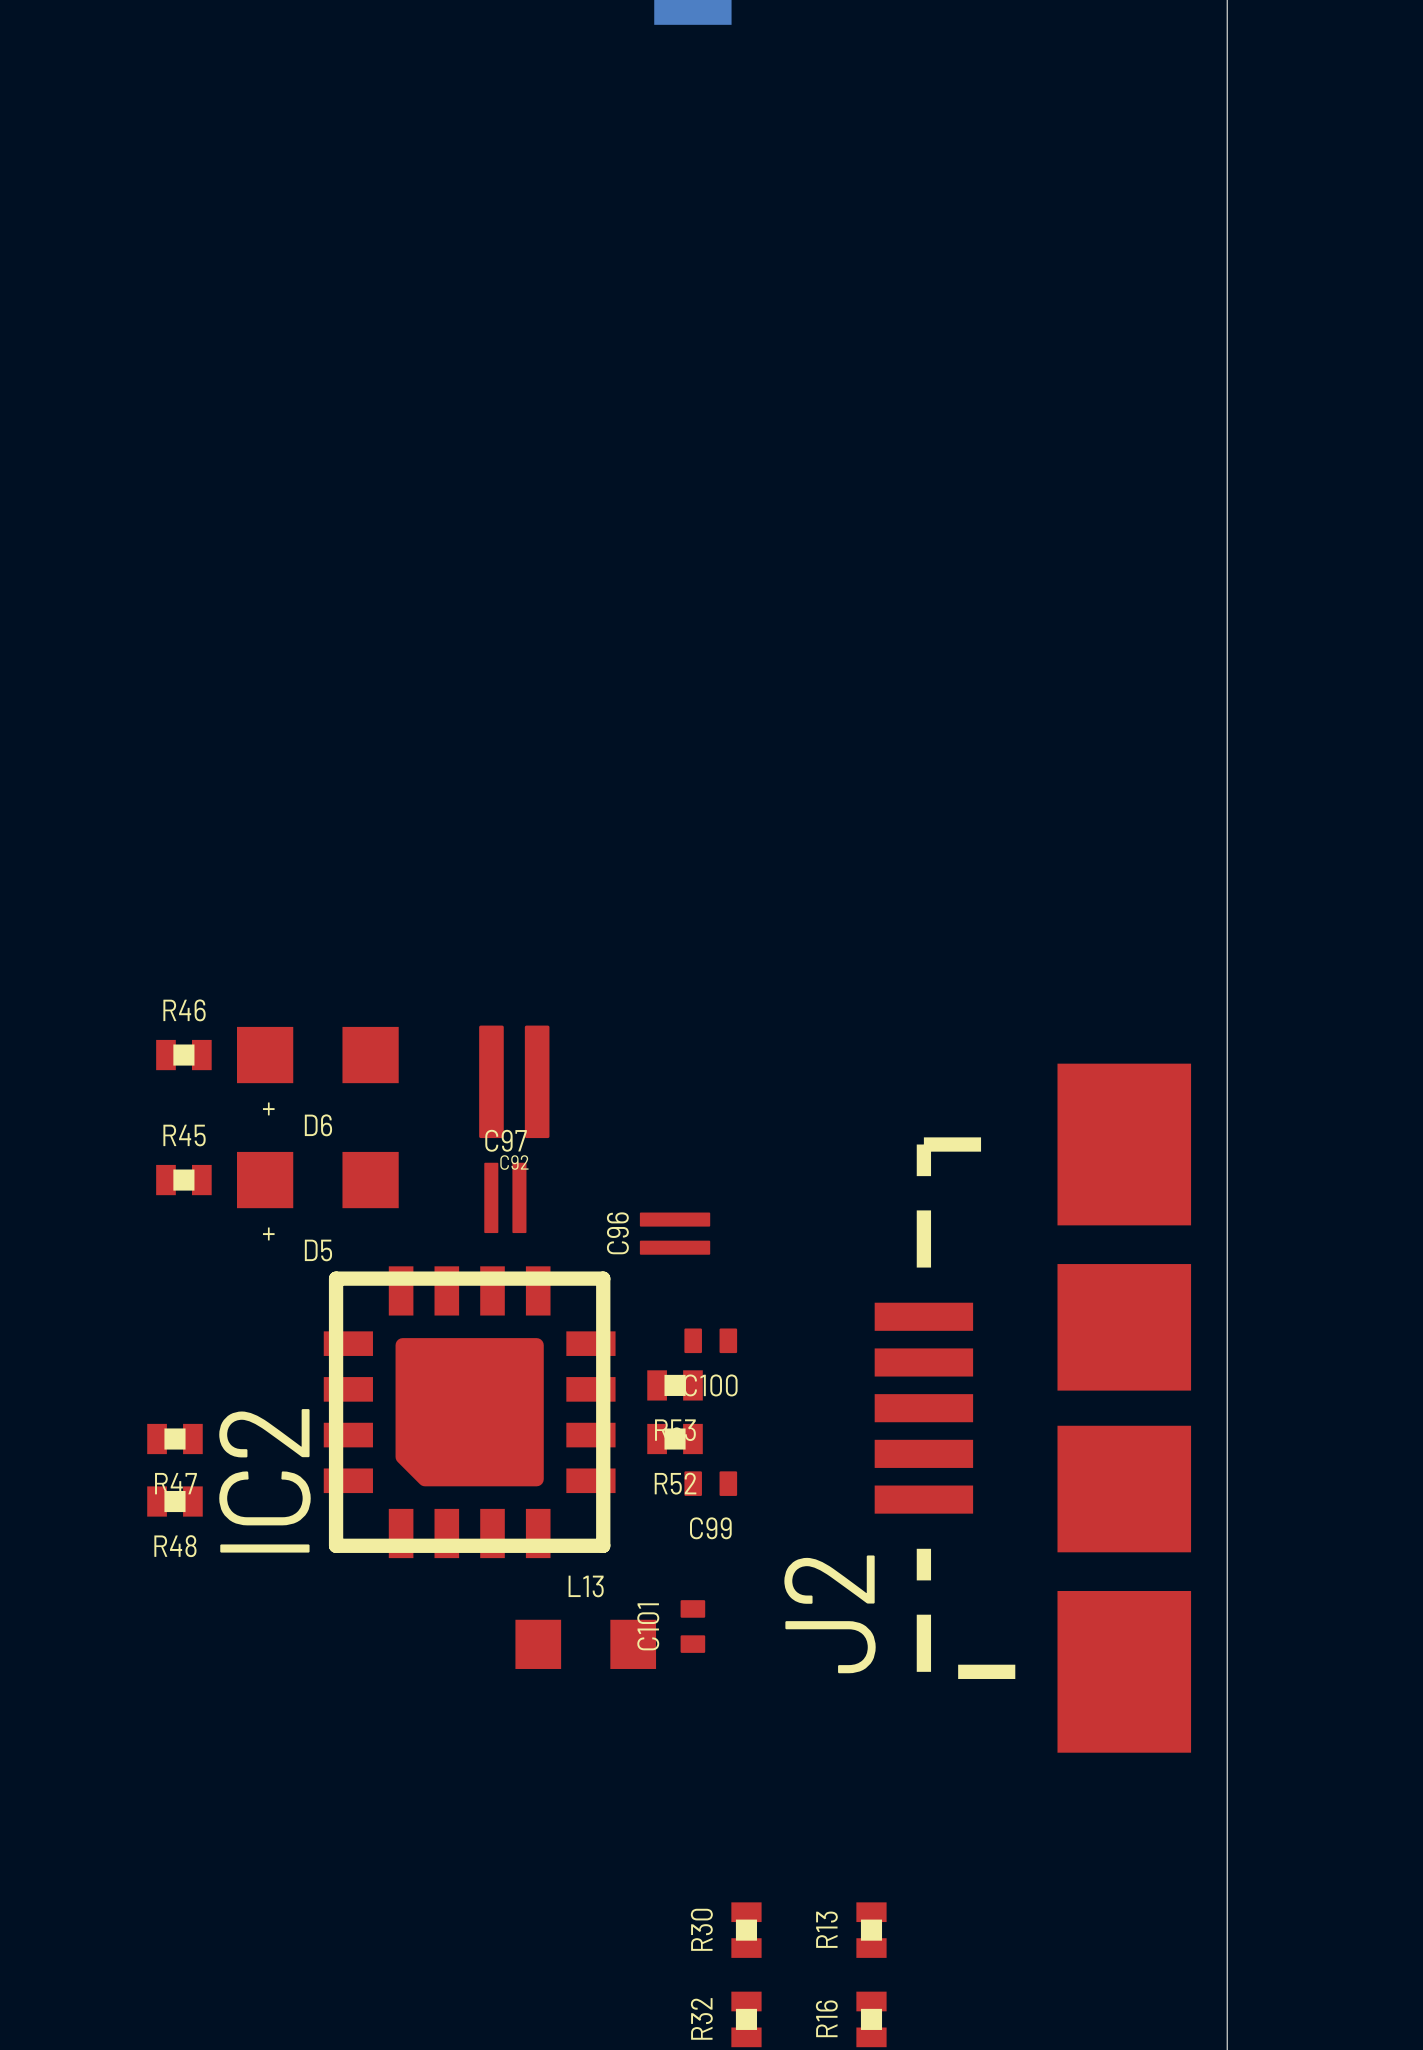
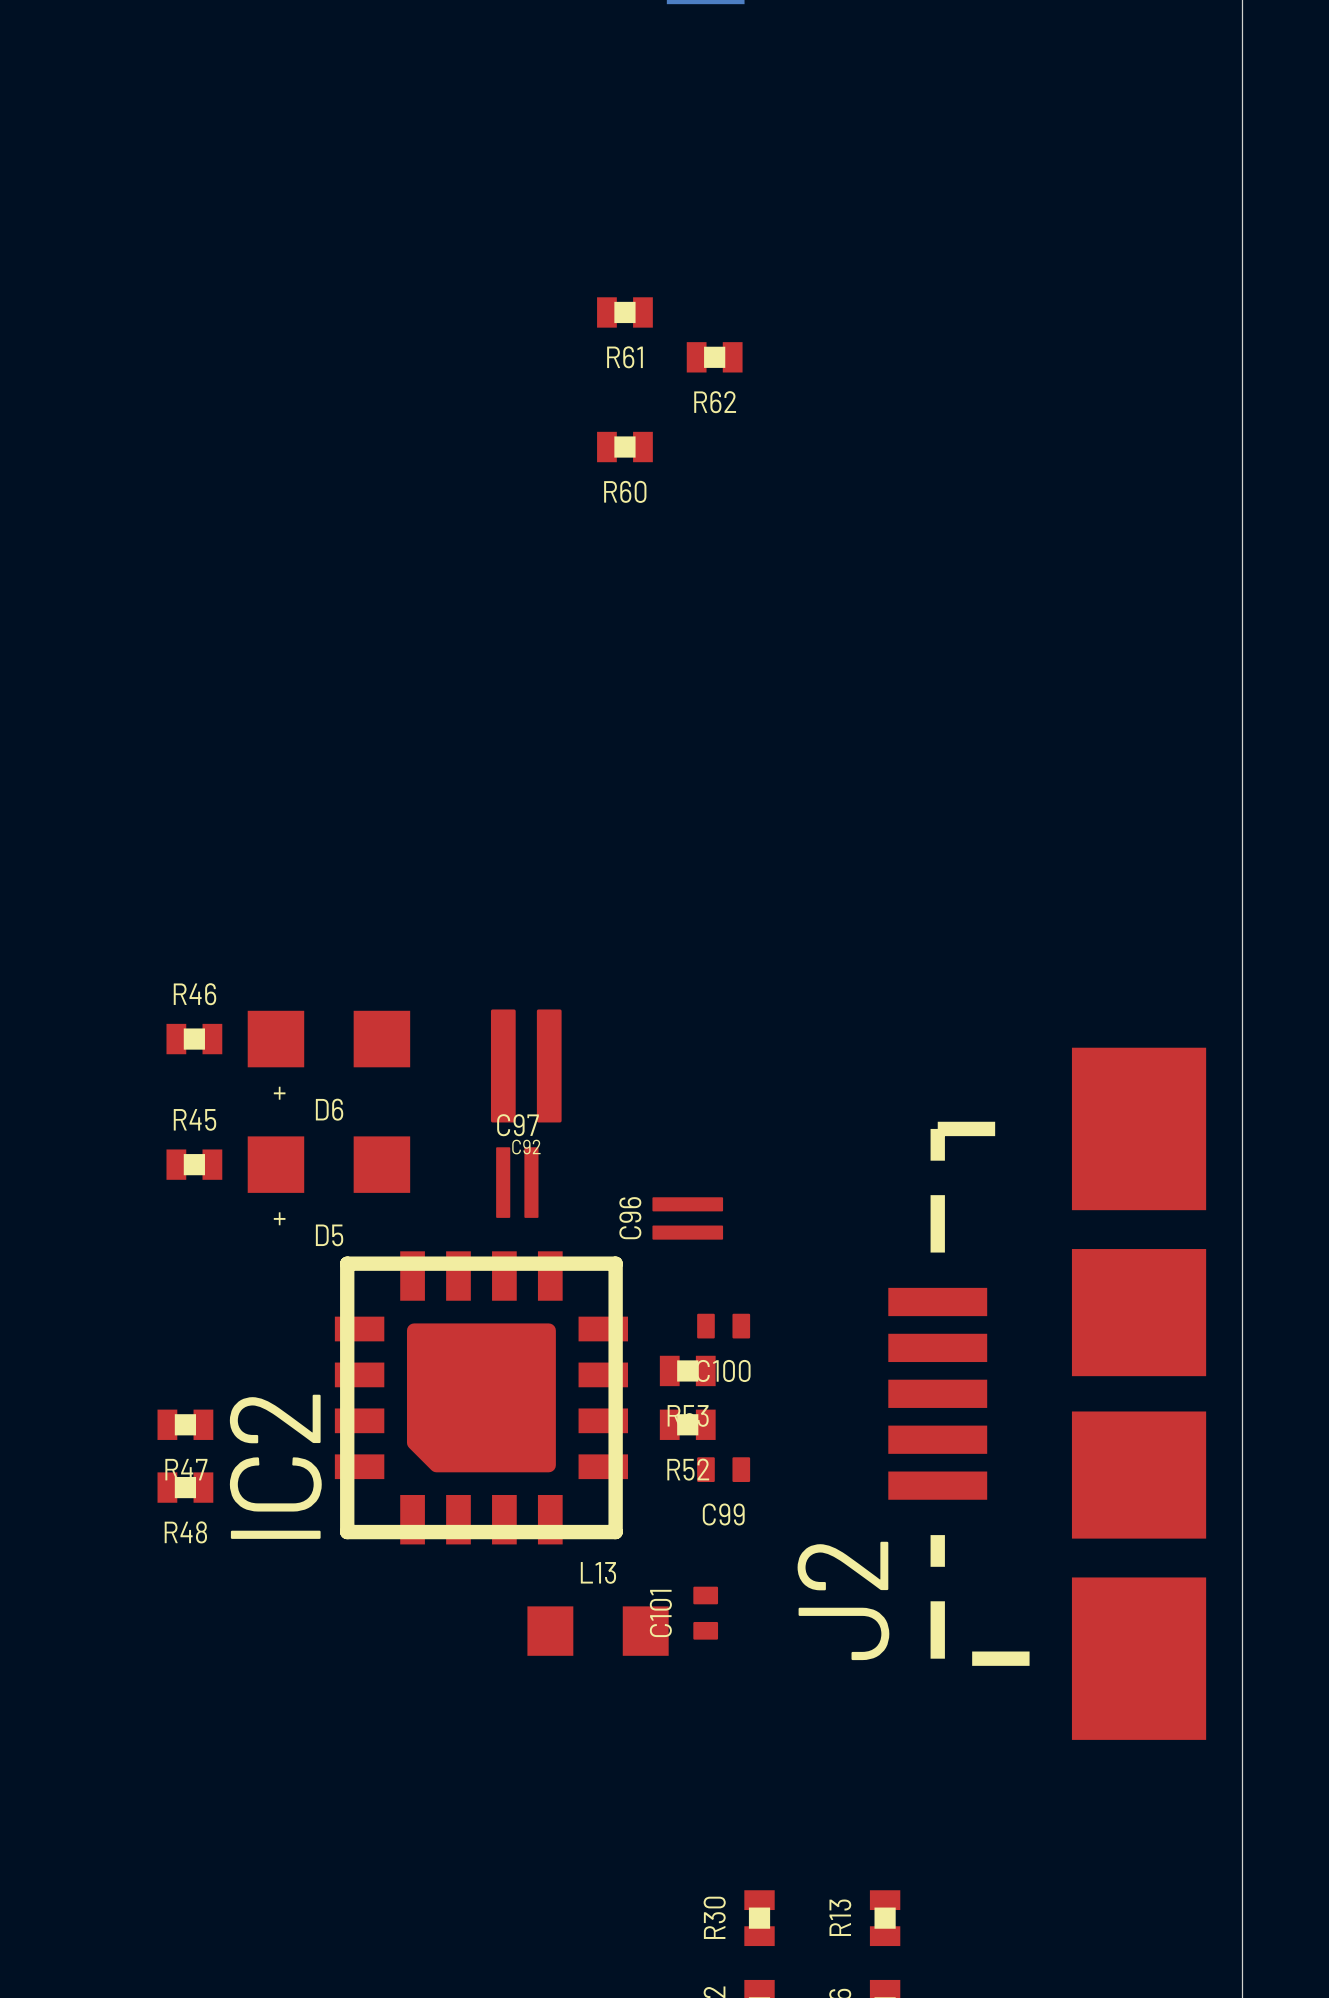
R61: none -> (624, 312)
R62: none -> (714, 357)
R60: none -> (624, 447)

